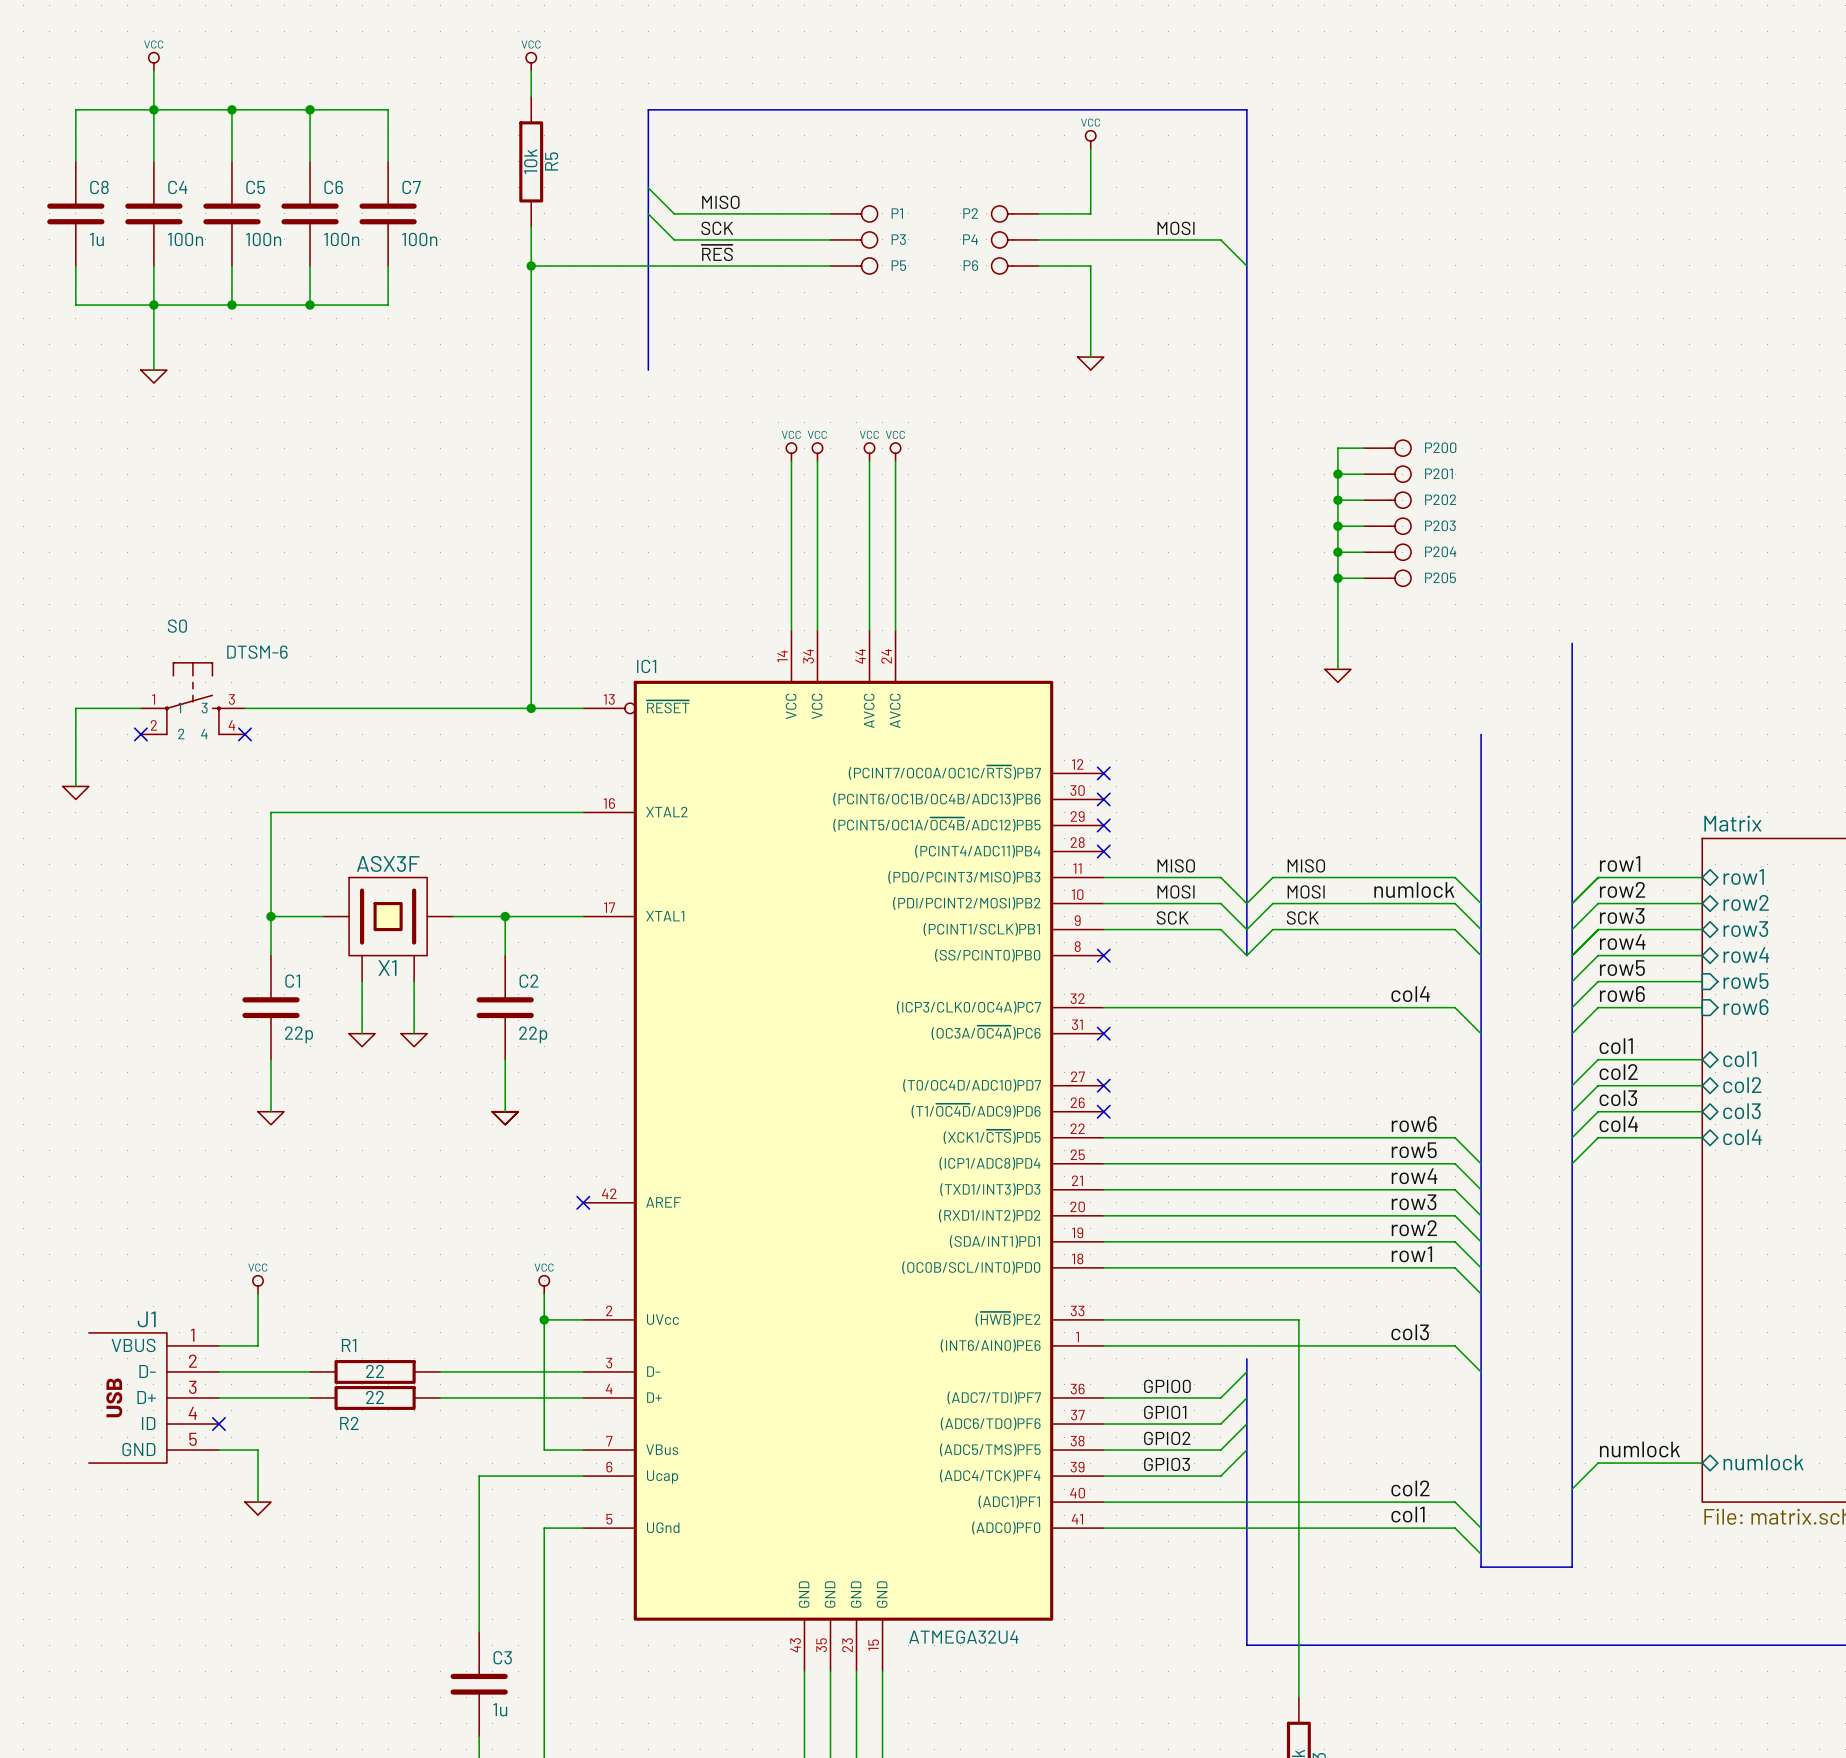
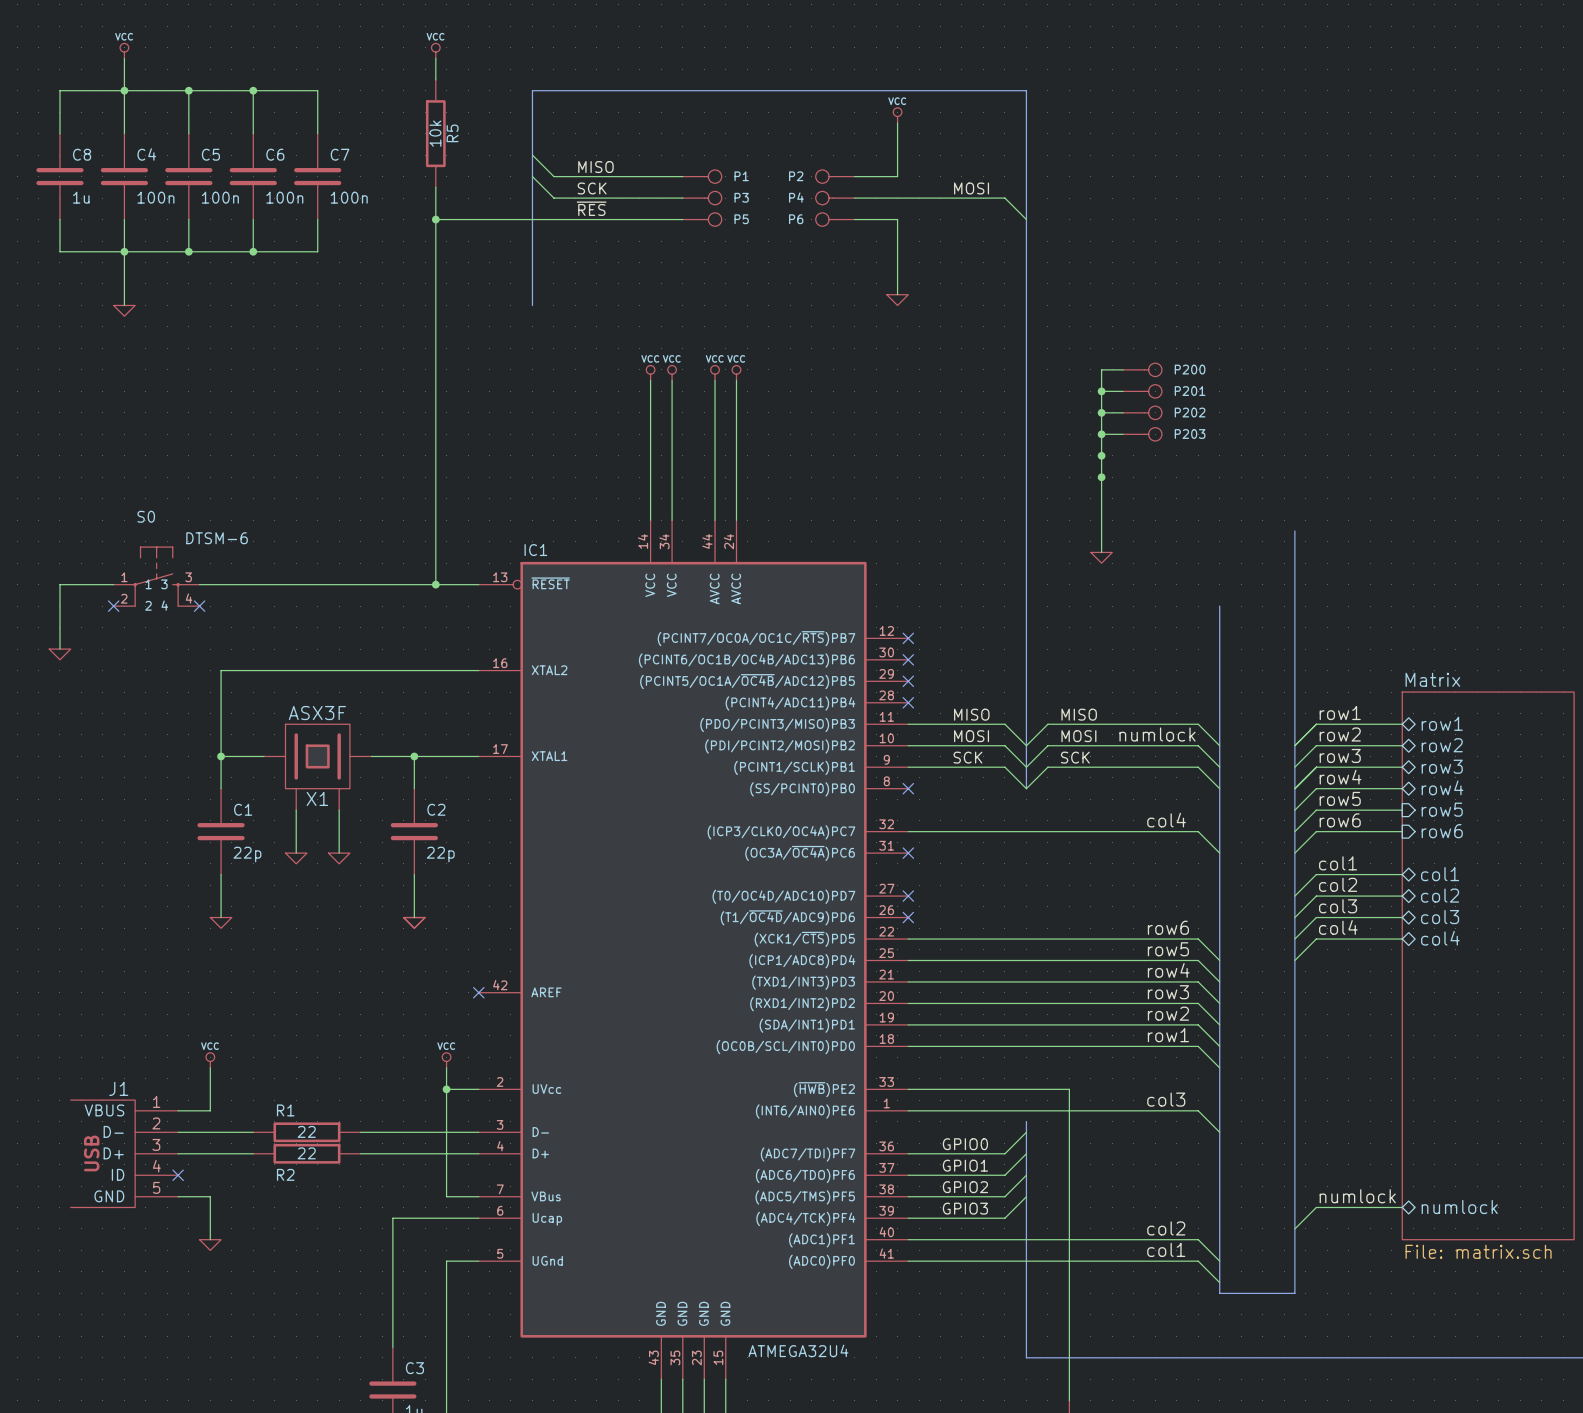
wire: (1337, 552) (1363, 552) -> none
P204: (1387, 552) -> none
wire: (1337, 578) (1363, 578) -> none
P205: (1387, 578) -> none

